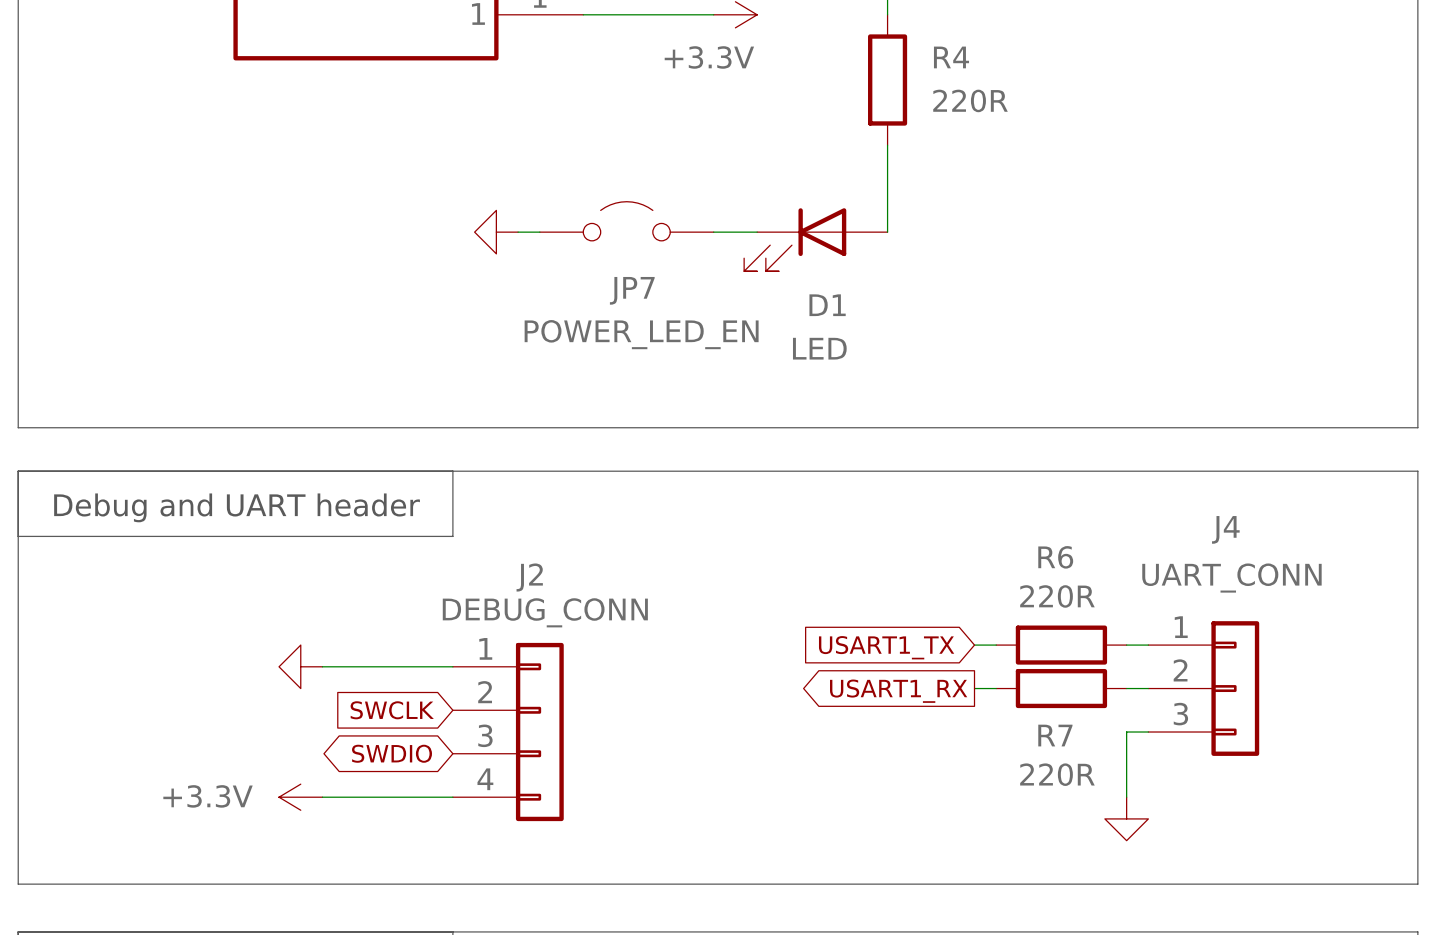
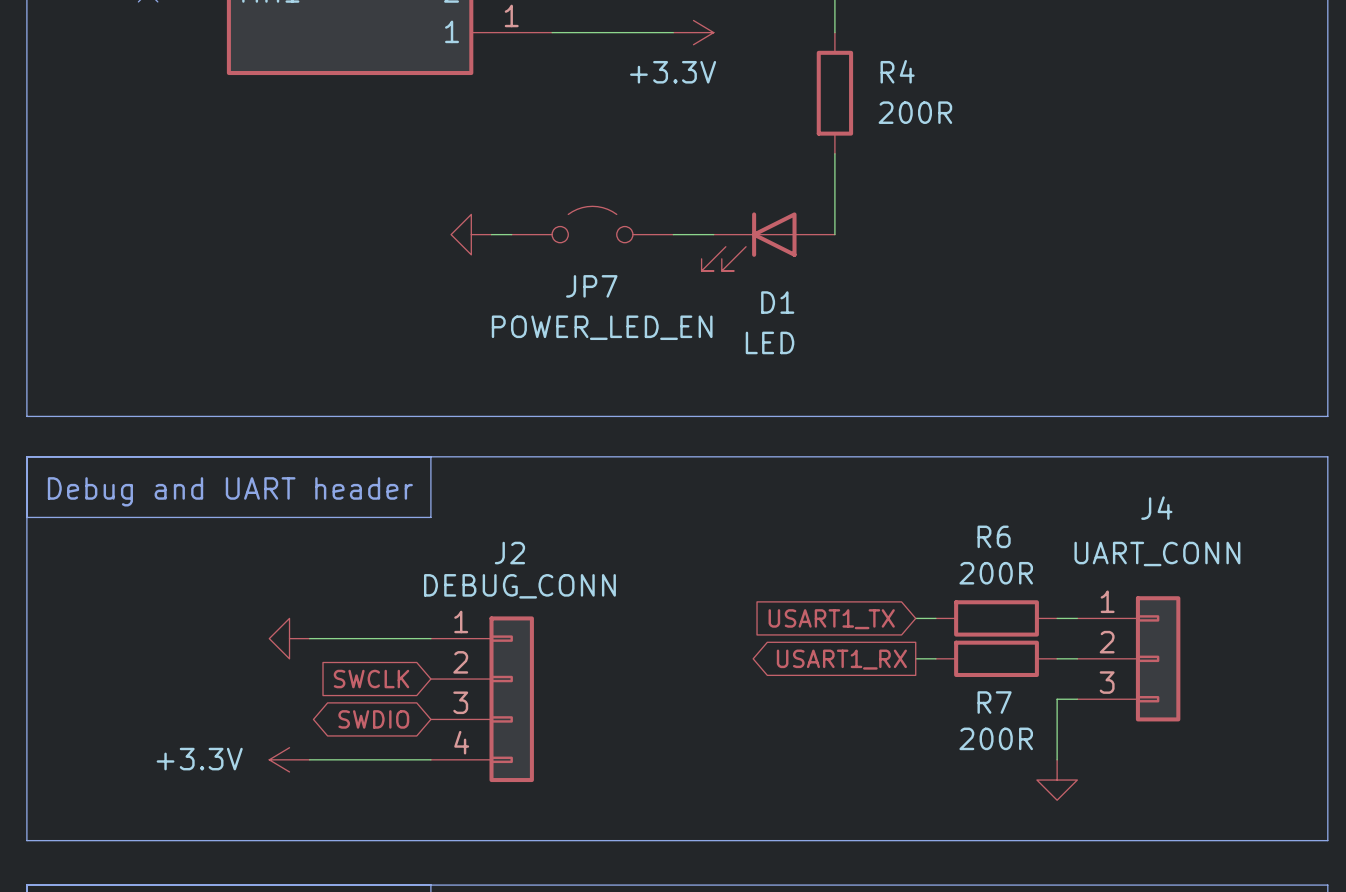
R4 value: 220R (970, 100) -> 200R (915, 112)
R6 value: 220R (1057, 596) -> 200R (996, 573)
R7 value: 220R (1057, 774) -> 200R (996, 738)

